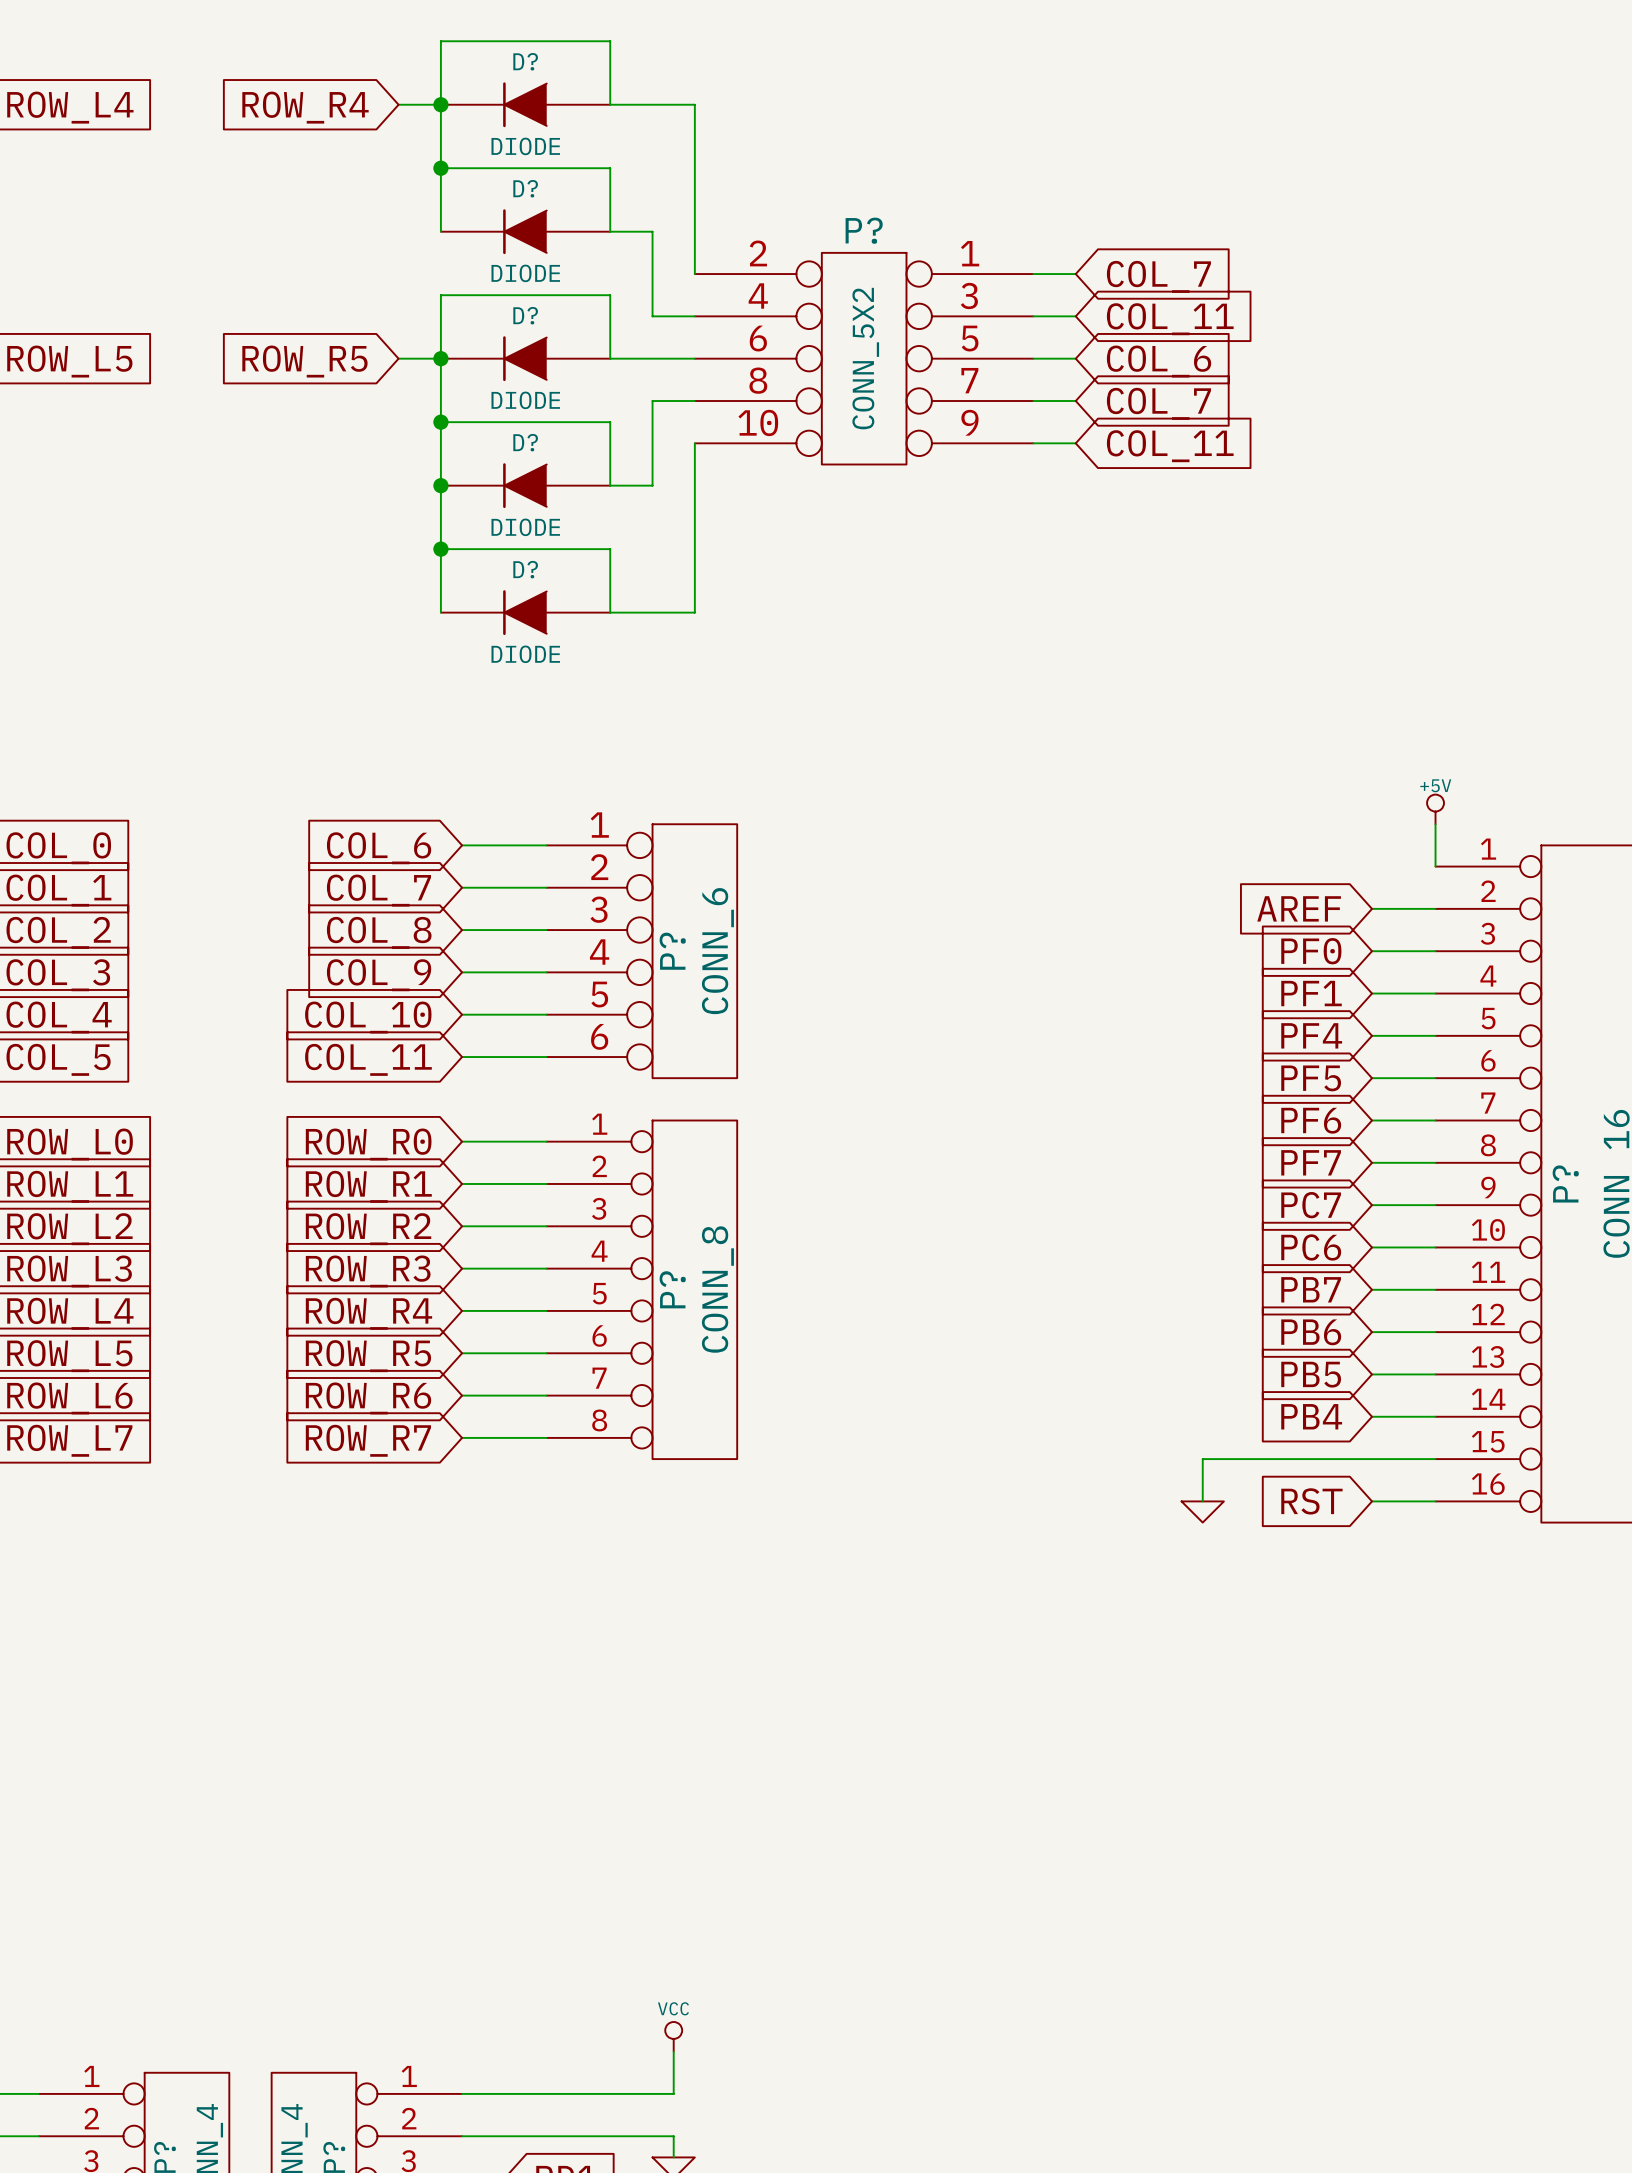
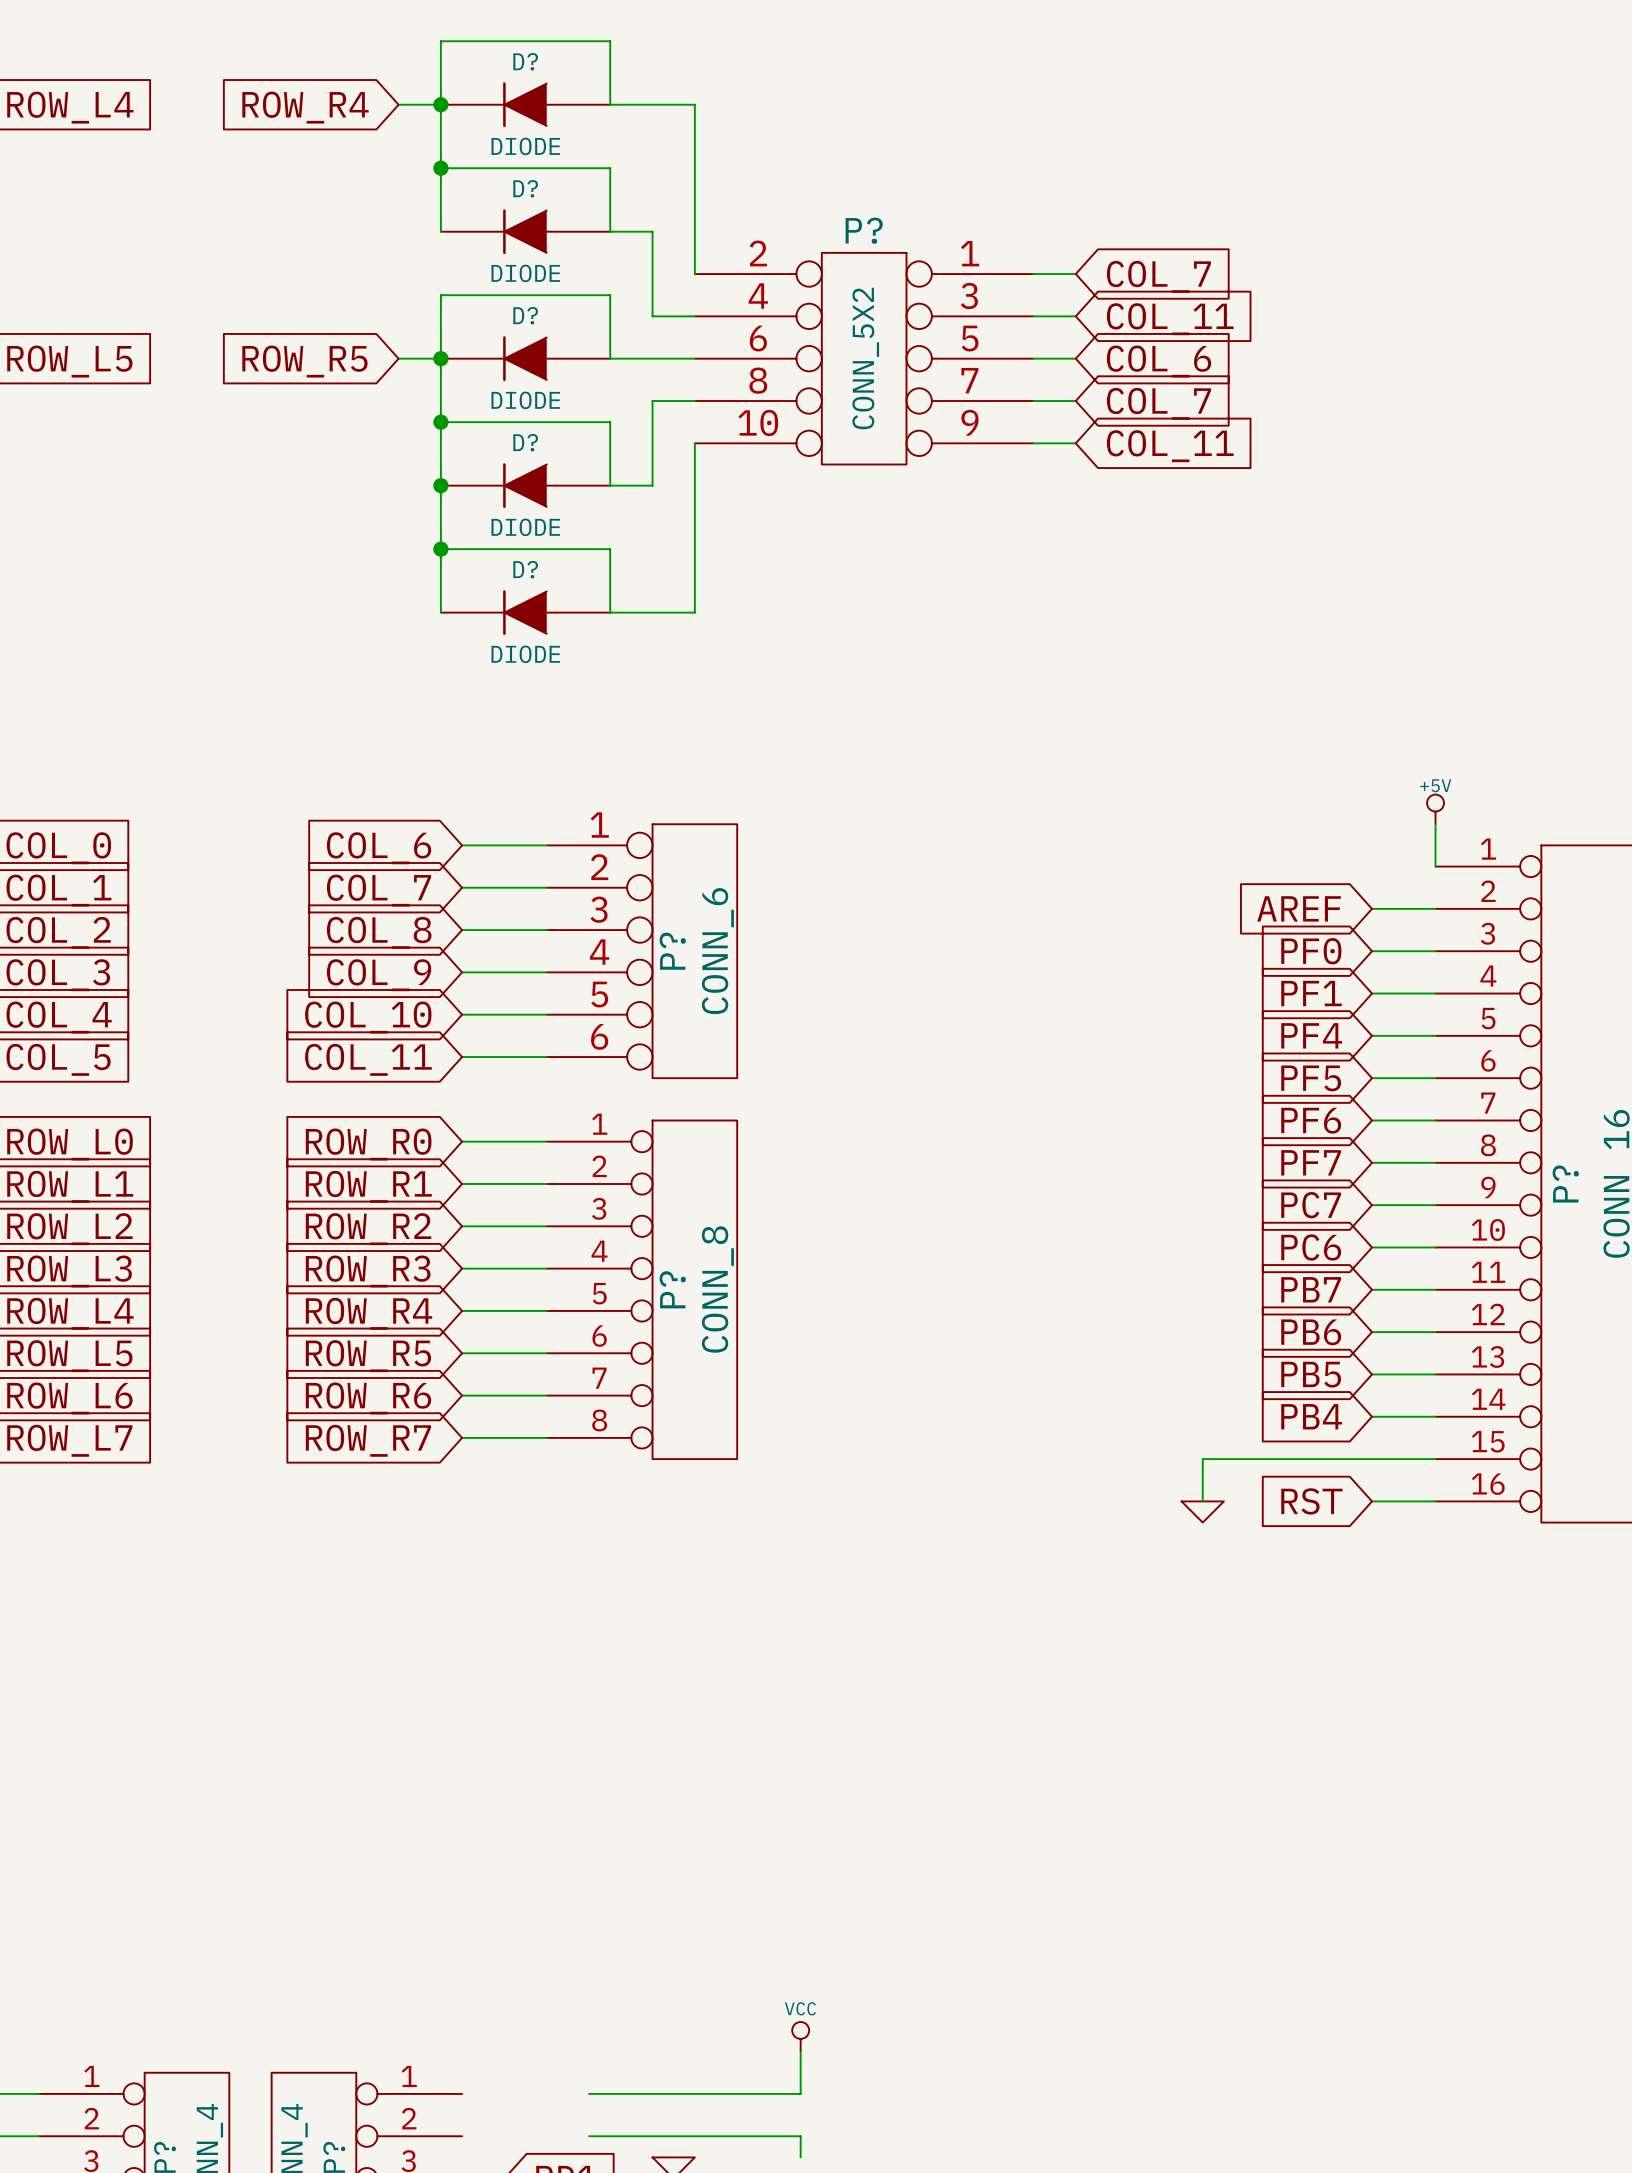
power symbol position: VCC (673, 2036) -> VCC (800, 2036)
wire: (673, 2051) (673, 2093) -> (800, 2051) (800, 2093) (673, 2093)
wire: (462, 2093) (589, 2093) -> none
wire: (462, 2136) (589, 2136) -> none
wire: (673, 2136) (673, 2157) -> (673, 2136) (800, 2136) (800, 2157)

